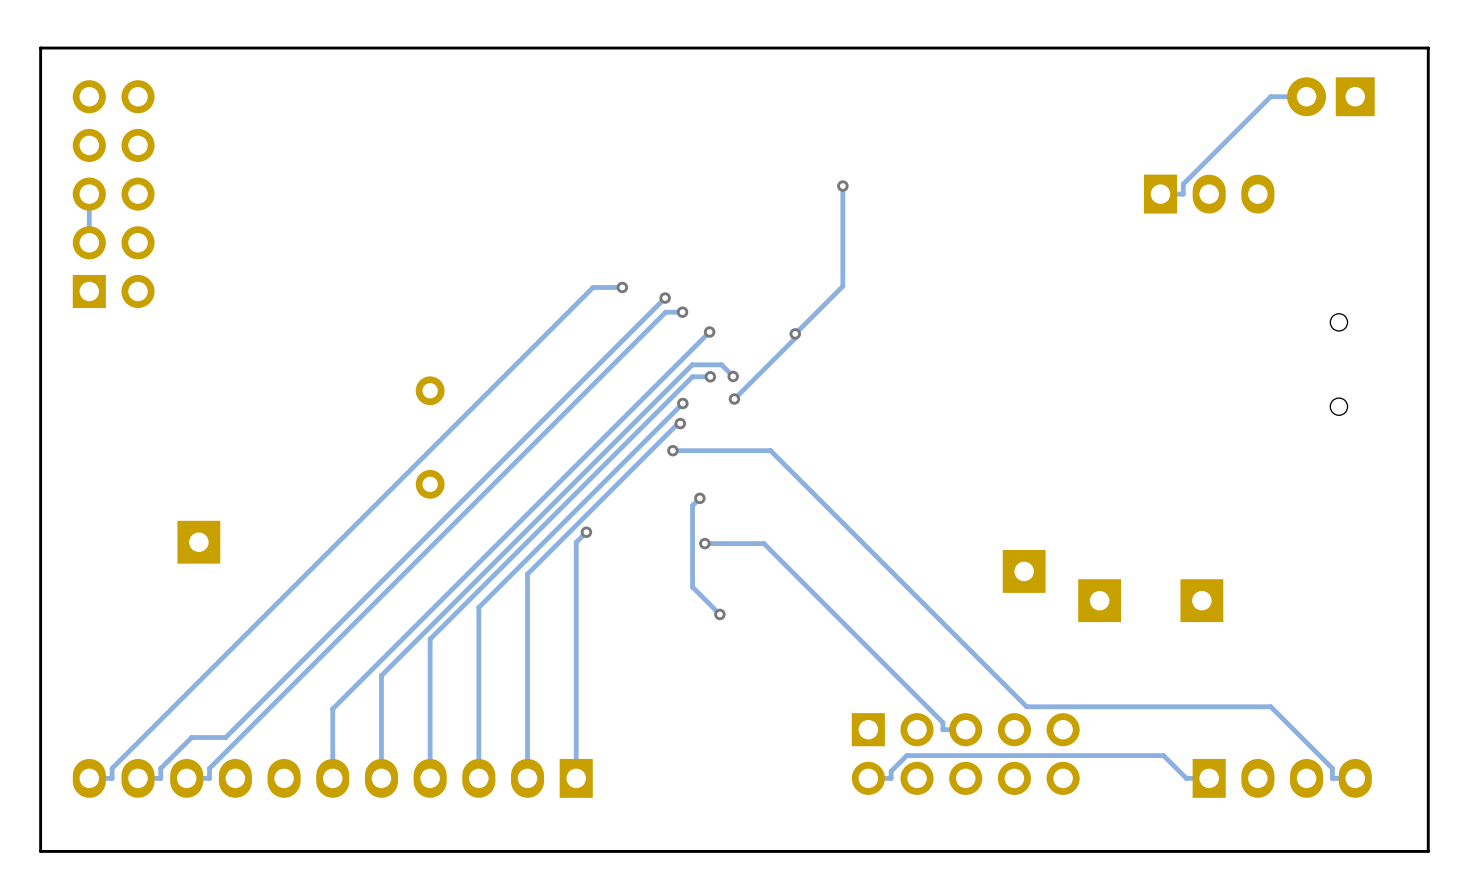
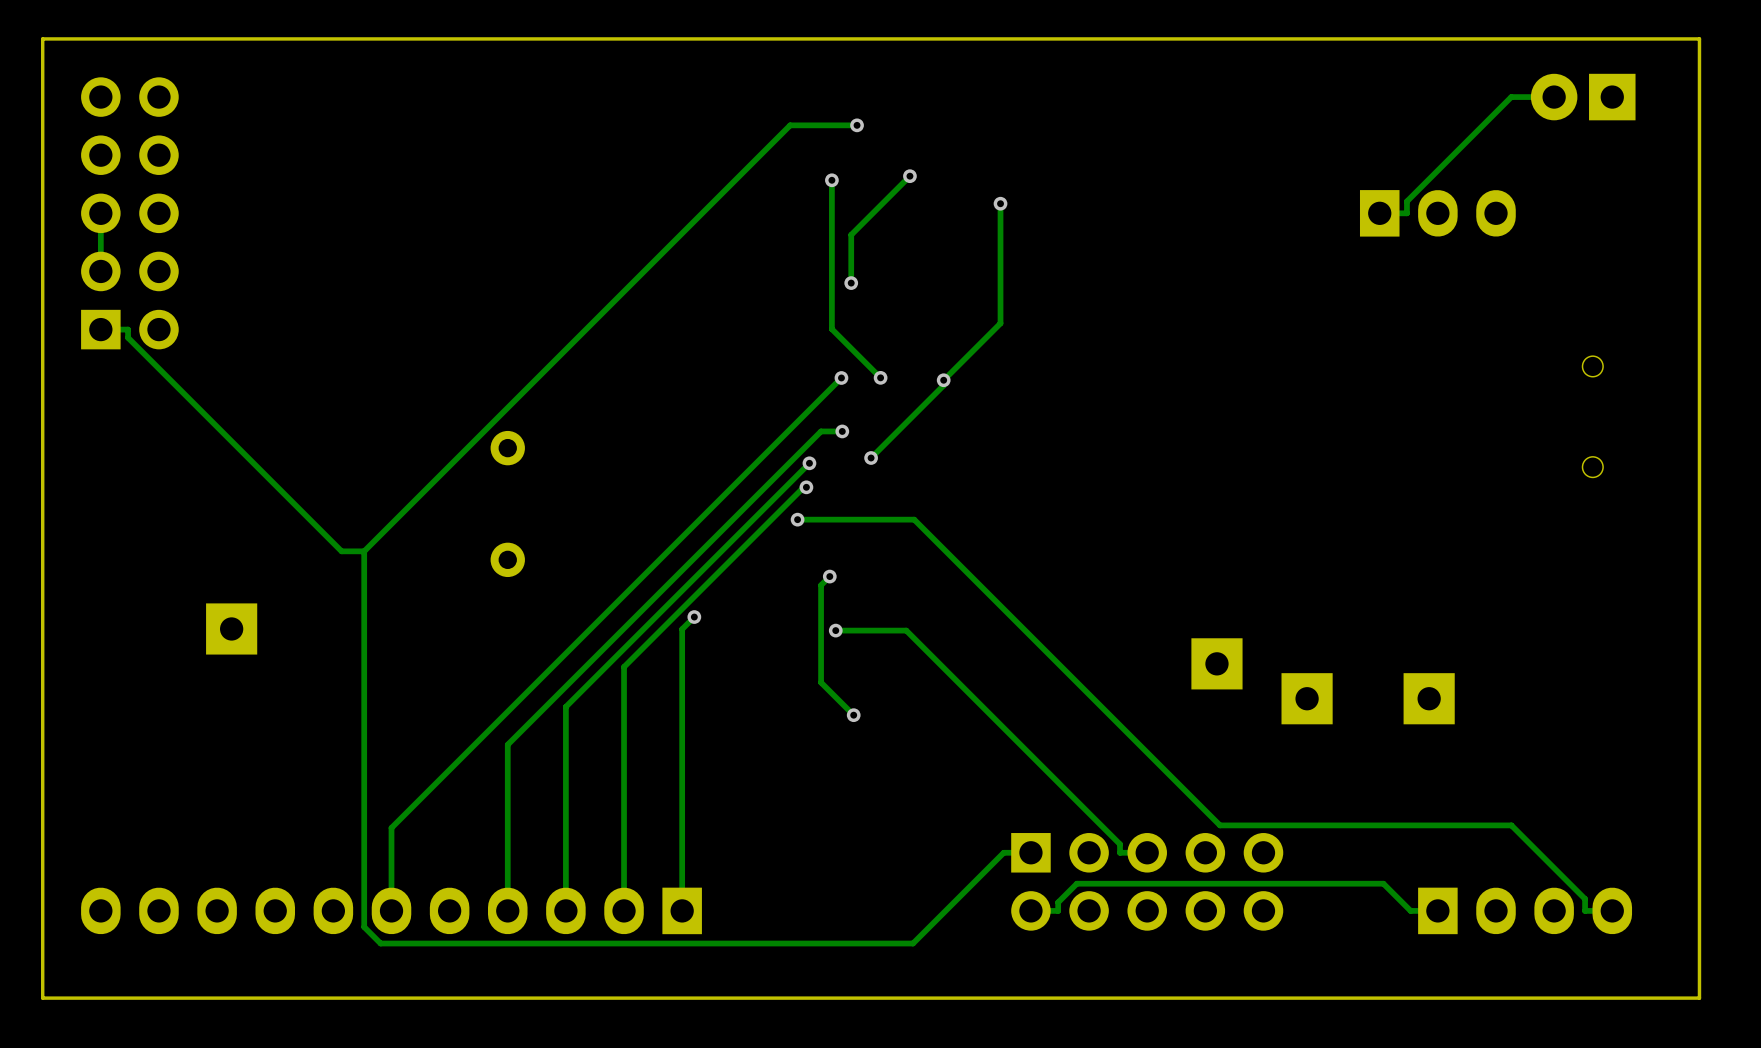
track: none -> (857, 125) (790, 125) (364, 551)
via: none -> (857, 125)
track: none -> (909, 176) (851, 234) (851, 283)
via: none -> (909, 176)
track: none -> (831, 180) (831, 329) (880, 377)
via: none -> (831, 180)
via: none -> (851, 283)
track: (622, 287) (593, 287) (112, 768) (112, 778) (89, 778) -> none
via: (622, 287) -> none
track: none -> (100, 329) (128, 329) (128, 337) (341, 551) (364, 551)
track: (665, 298) (225, 737) (191, 737) (160, 768) (160, 778) (138, 778) -> none
via: (665, 298) -> none
track: (682, 312) (665, 312) (209, 768) (209, 778) (186, 778) -> none
via: (682, 312) -> none
via: none -> (880, 377)
track: (733, 376) (721, 364) (692, 364) (381, 675) (381, 778) -> none
via: (733, 376) -> none
track: none -> (364, 551) (364, 927) (380, 943) (913, 943) (1003, 852) (1030, 852)

